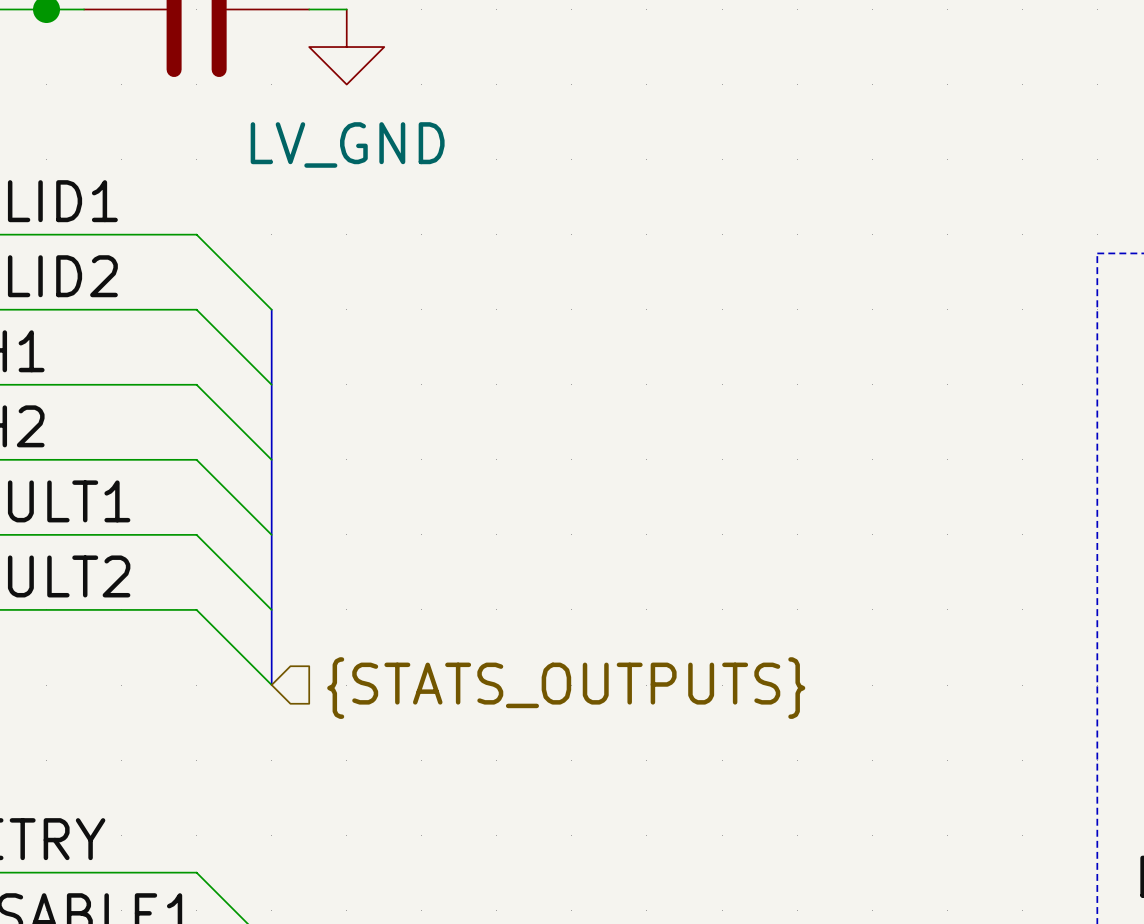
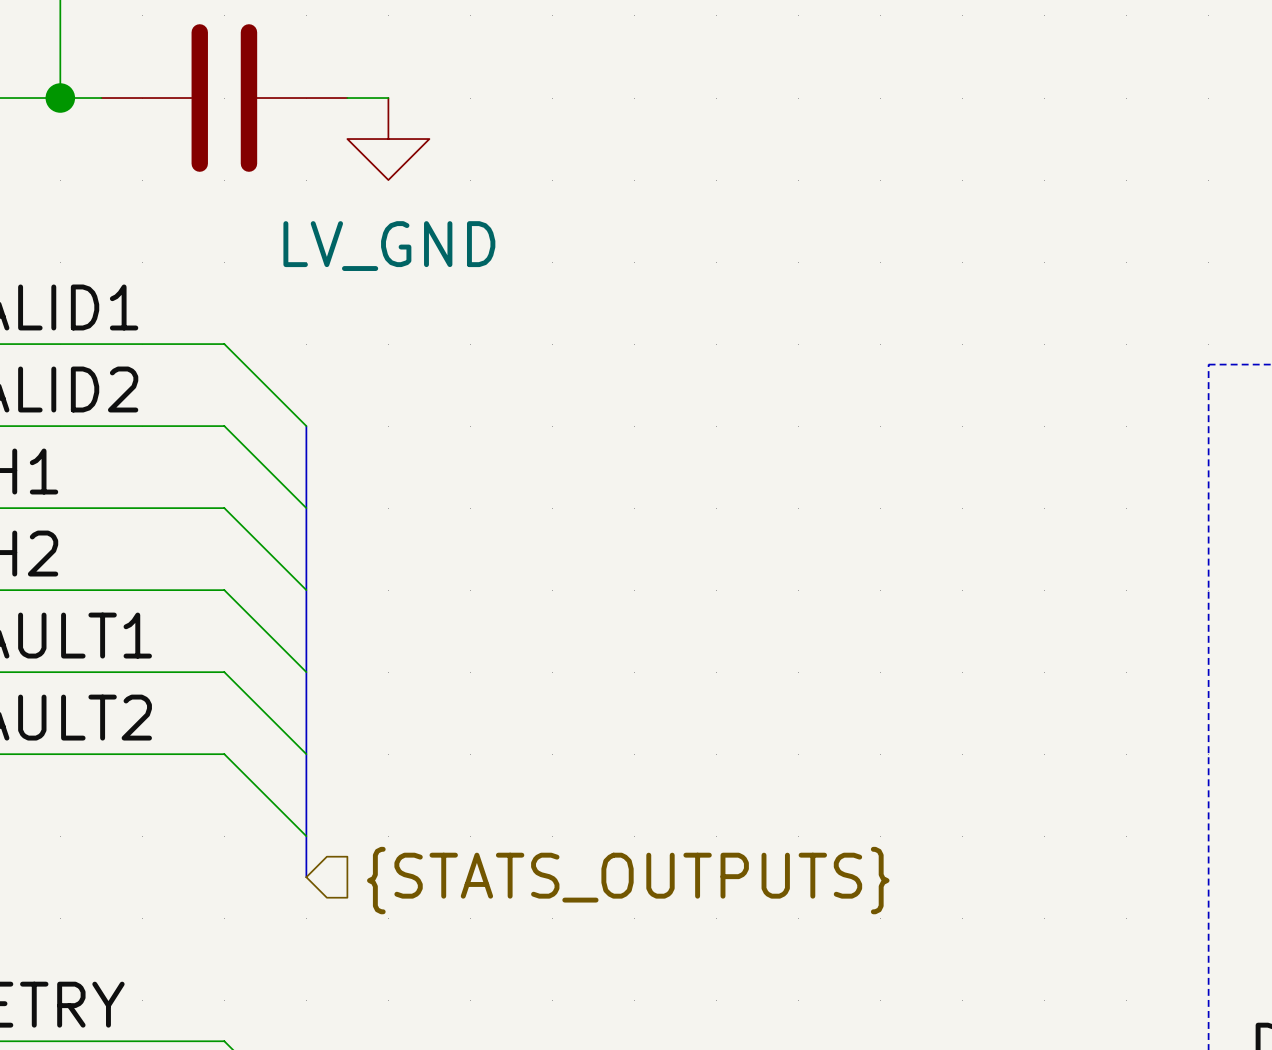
bus: none -> (306, 836) (306, 877)
hierarchical label position: {STATS_OUTPUTS} (566, 688) -> {STATS_OUTPUTS} (628, 880)

